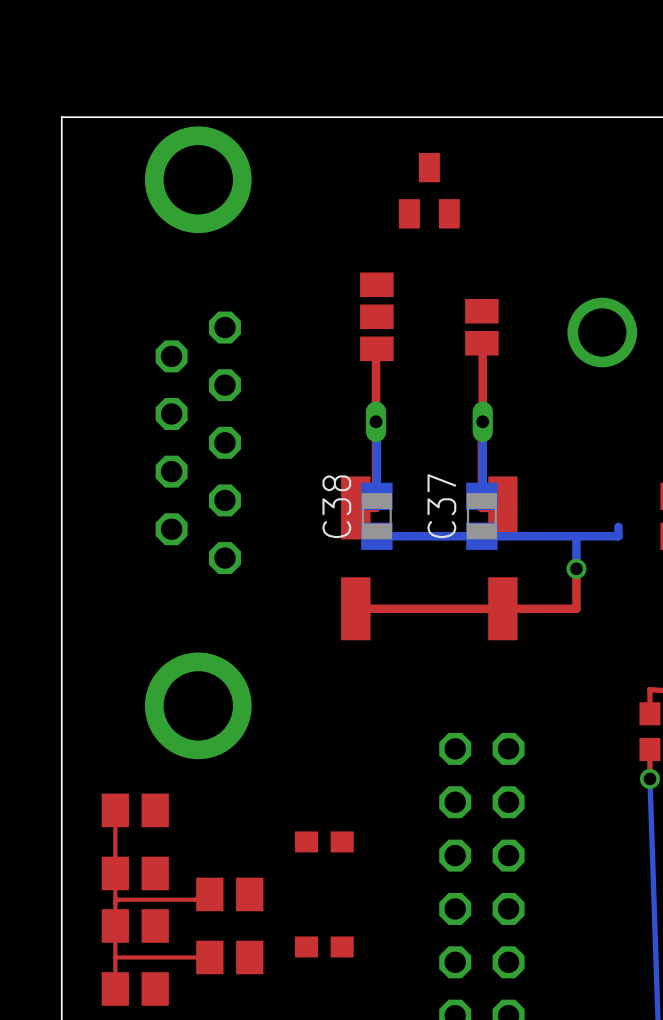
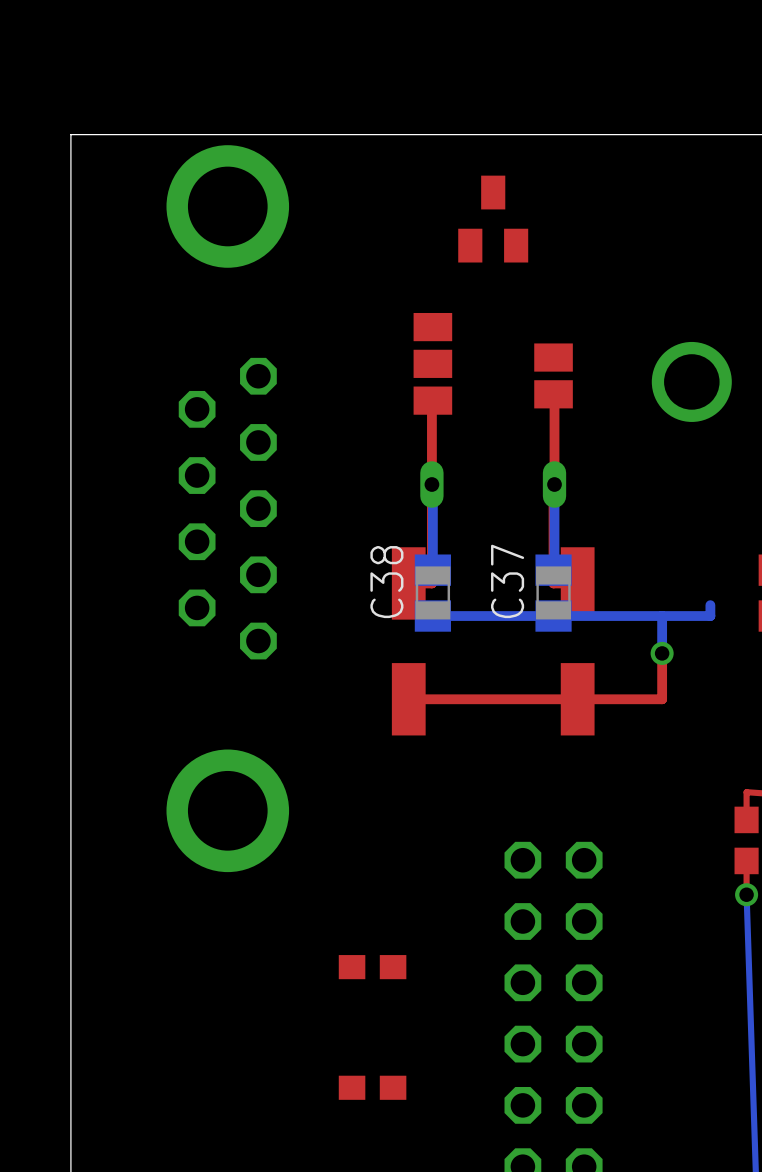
top track: (115, 810) (115, 988) -> none
part: (135, 810) -> none
part: (135, 873) -> none
top track: (209, 894) (200, 894) (195, 899) (117, 899) (115, 902) -> none
part: (229, 894) -> none
part: (135, 925) -> none
top track: (209, 957) (115, 957) -> none
part: (229, 957) -> none
part: (135, 988) -> none

